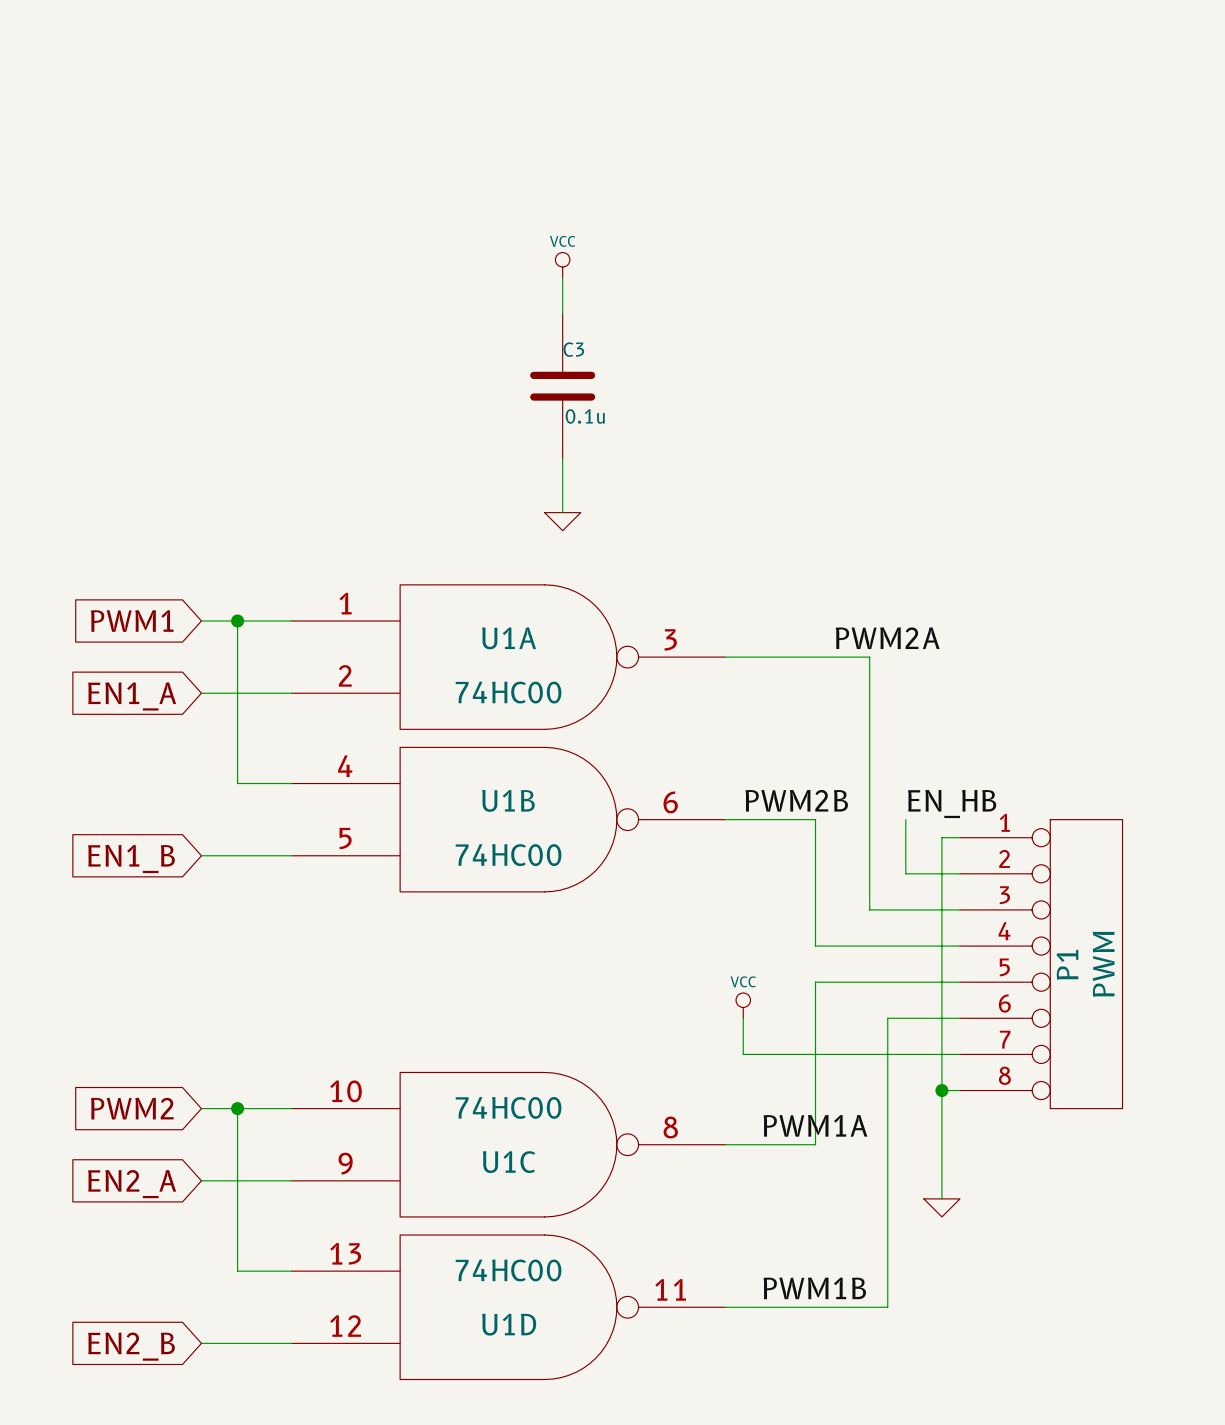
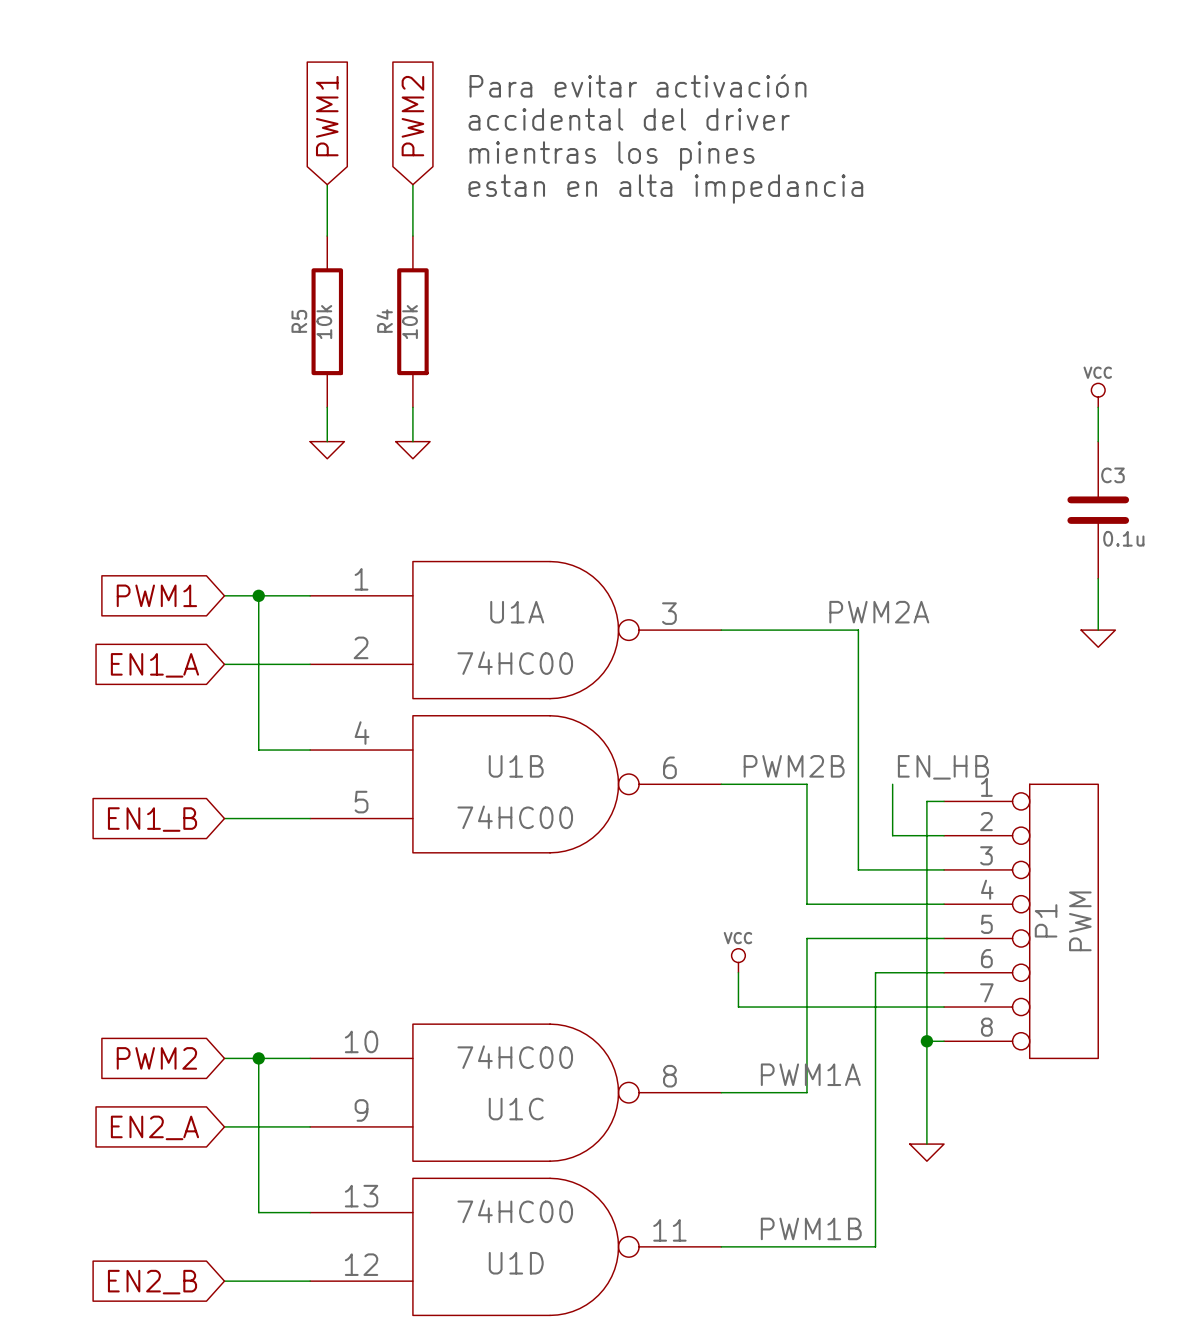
text: none -> Para evitar activación (637, 85)
text: none -> accidental del driver (629, 119)
global label: none -> PWM1 (327, 116)
global label: none -> PWM2 (412, 116)
text: none -> mientras los pines (612, 155)
wire: none -> (327, 184) (327, 236)
text: none -> estan en alta impedancia (665, 189)
power symbol: VCC (562, 265) -> none
wire: (562, 277) (562, 313) -> (412, 407) (412, 441)
R5: none -> 10k (327, 321)
R4: none -> 10k (412, 321)
C3 position: (562, 386) -> (1098, 510)
power symbol: none -> VCC (1098, 395)
wire: none -> (327, 407) (327, 441)
wire: none -> (1098, 407) (1098, 441)
wire: (562, 458) (562, 512) -> (412, 184) (412, 236)
power symbol: none -> (327, 450)
power symbol: none -> (412, 450)
power symbol: (562, 521) -> none
wire: none -> (1098, 578) (1098, 630)
power symbol: none -> (1098, 638)

